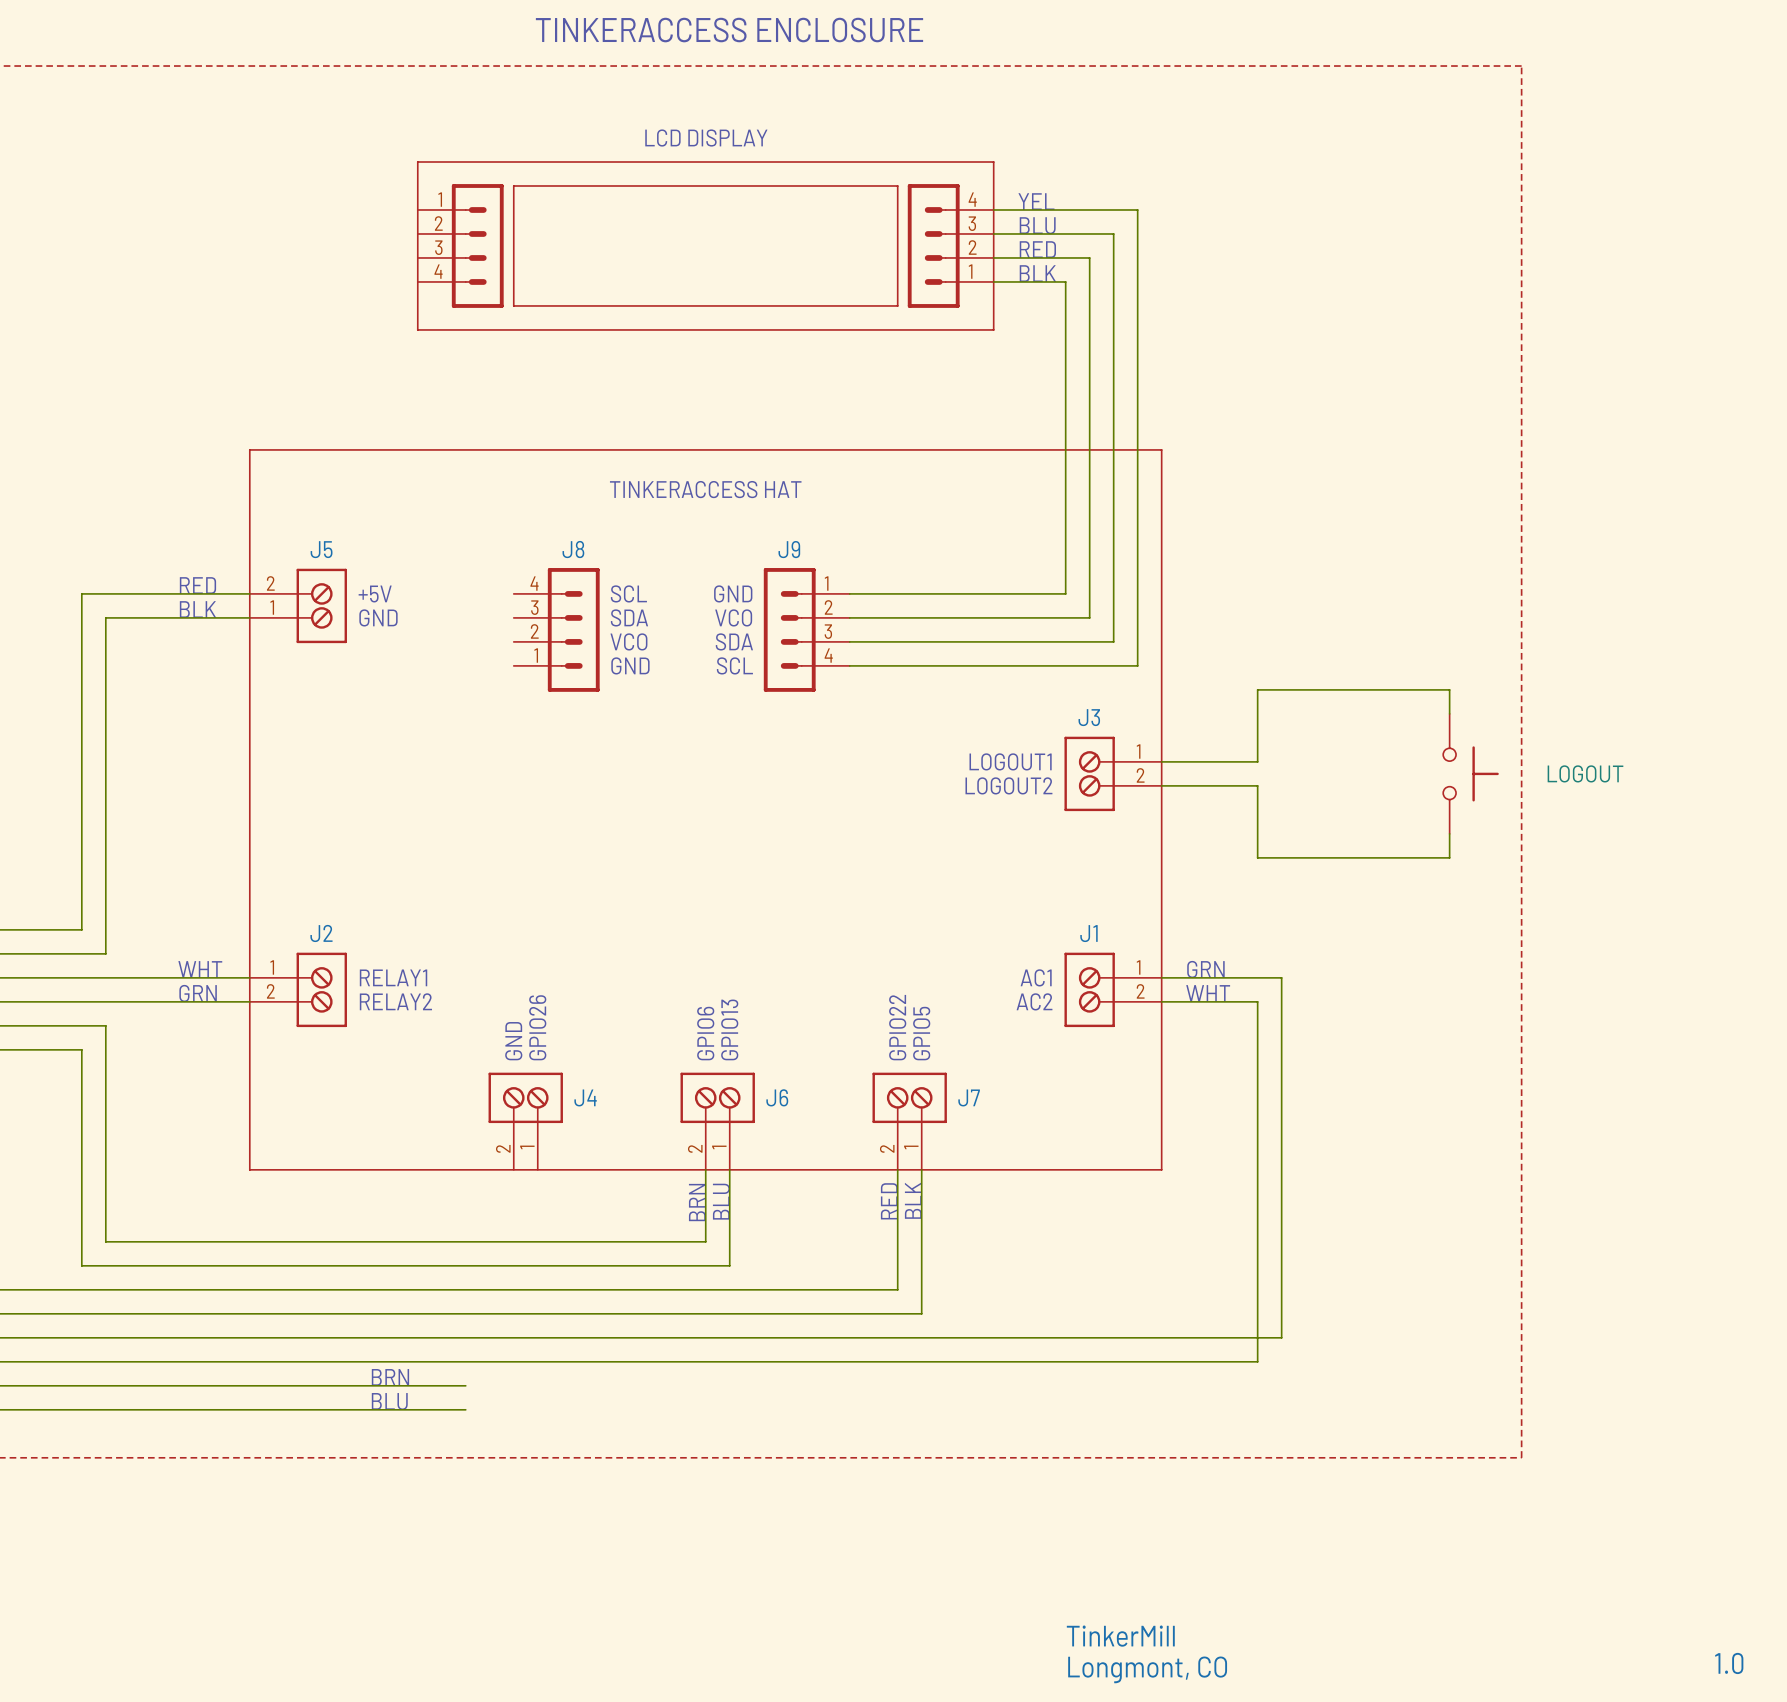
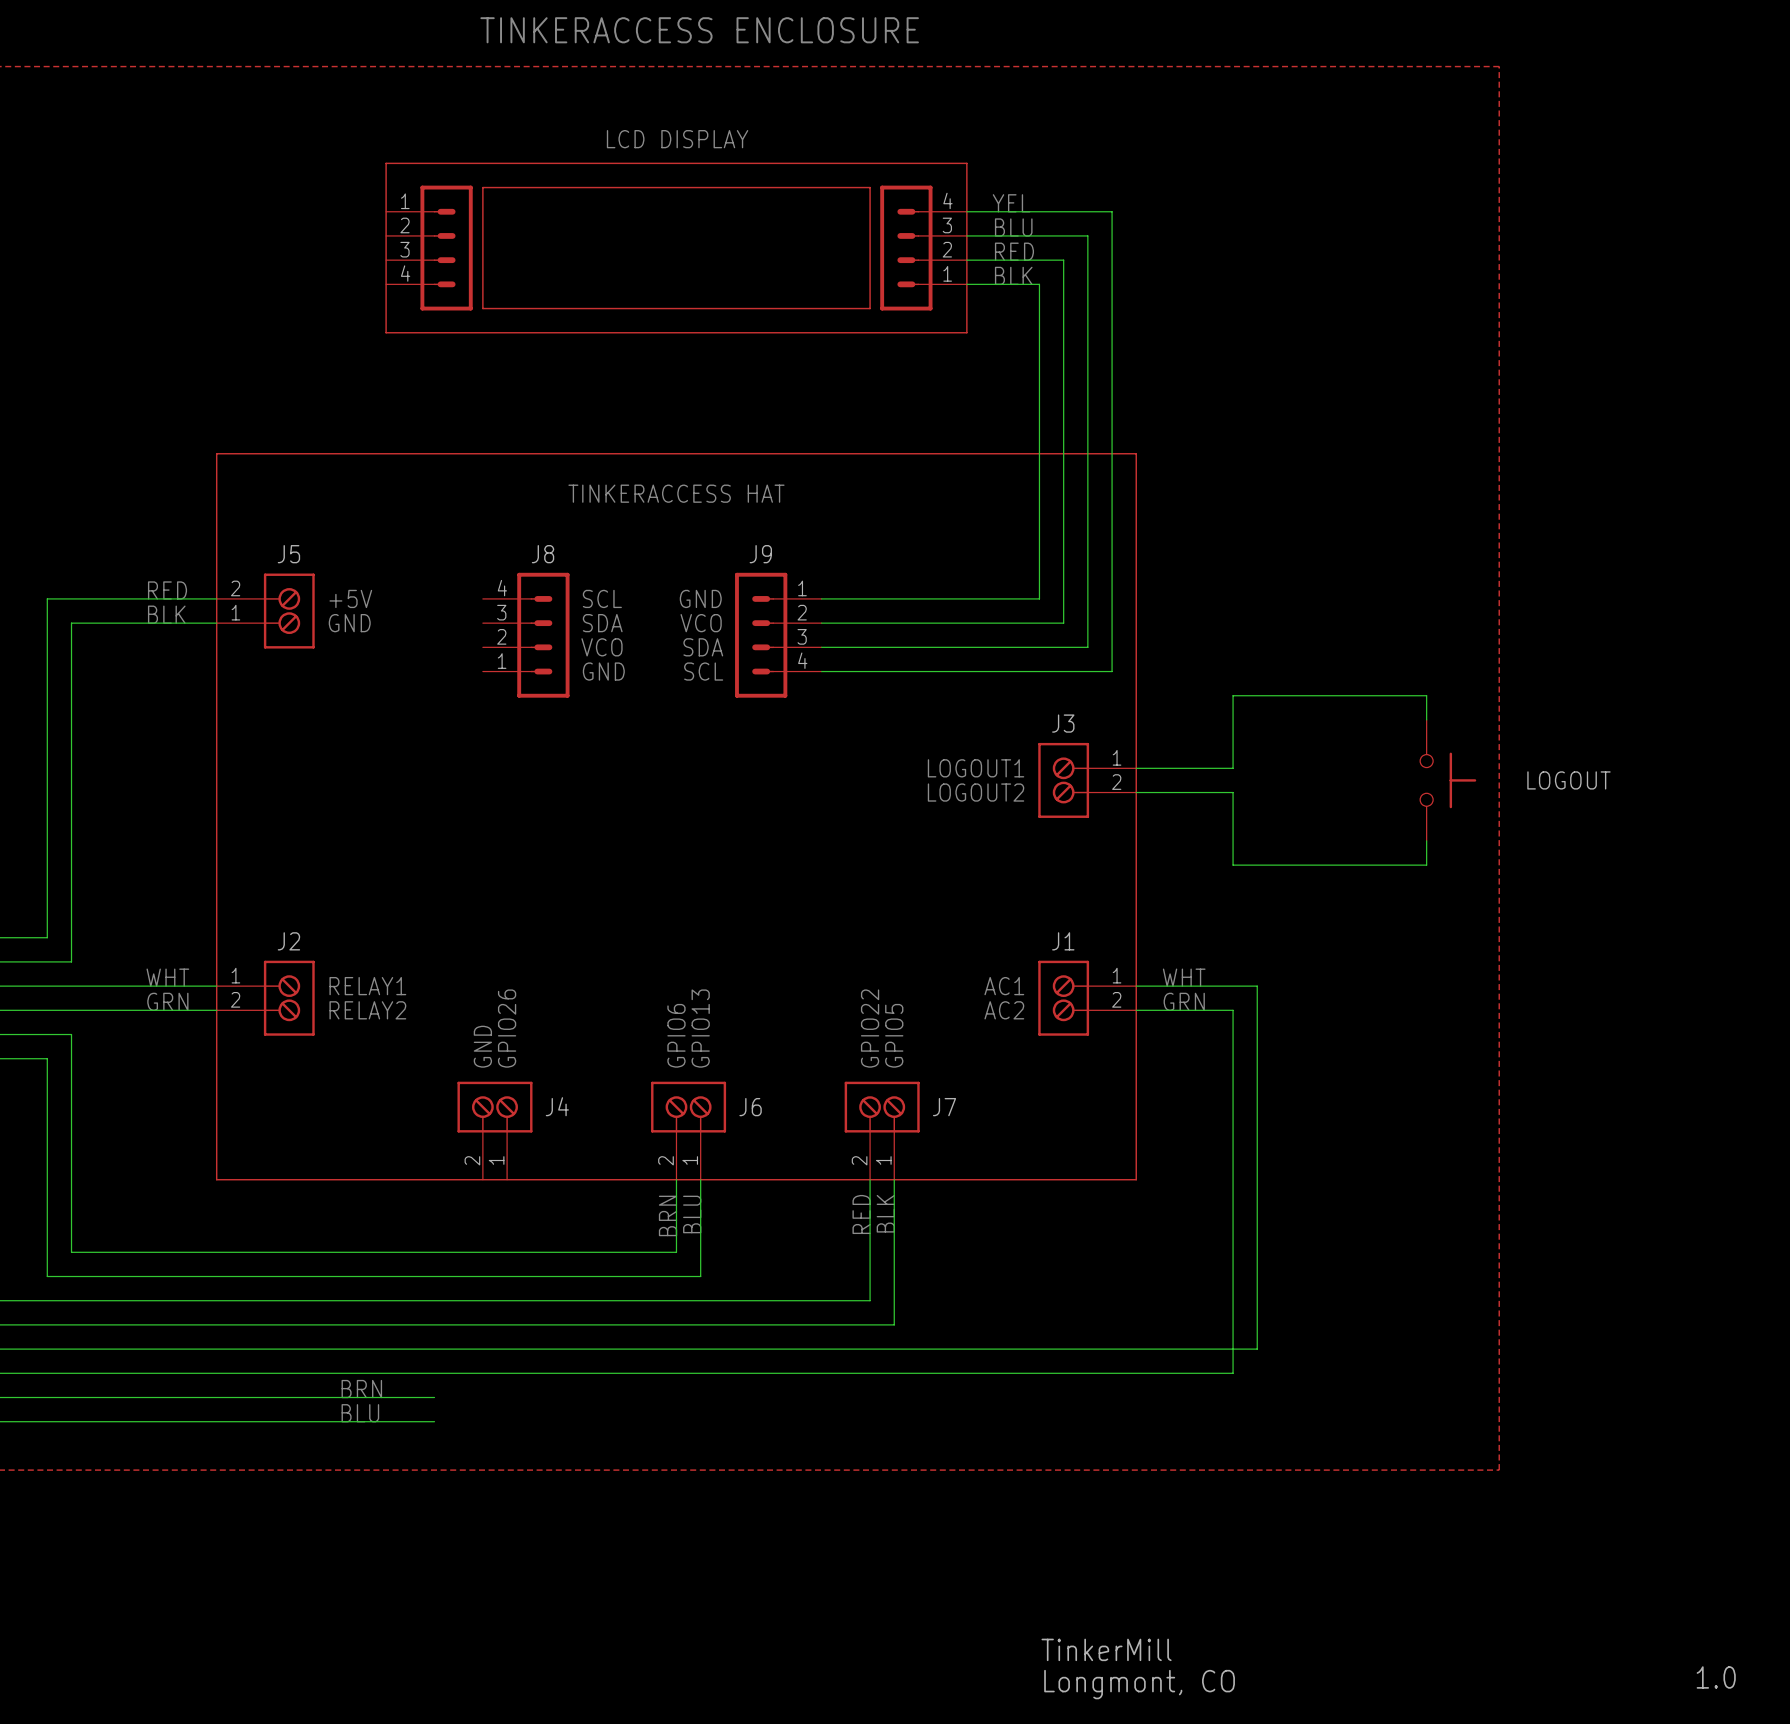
text: GRN (1205, 969) -> WHT (1184, 977)
text: WHT (1208, 993) -> GRN (1184, 1001)

